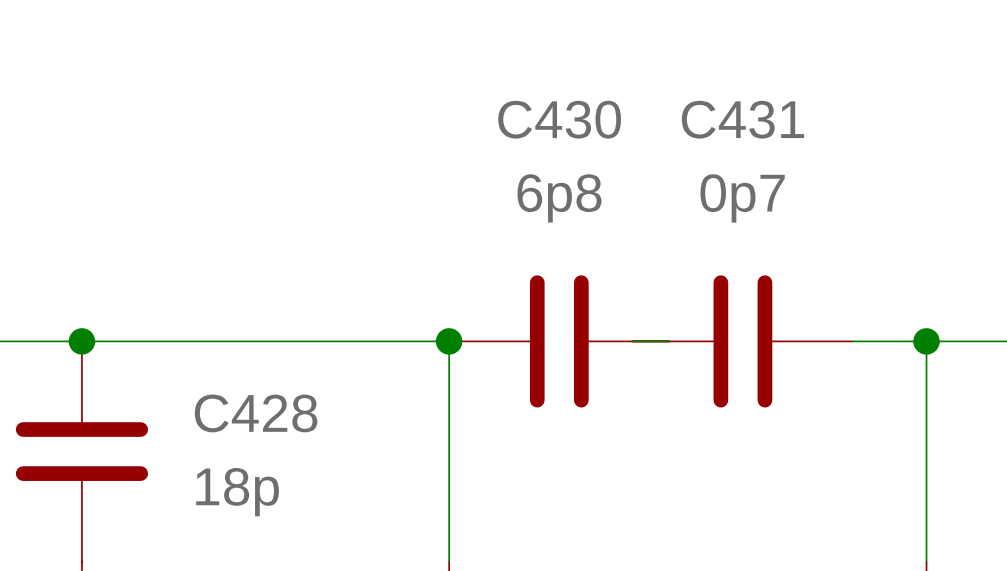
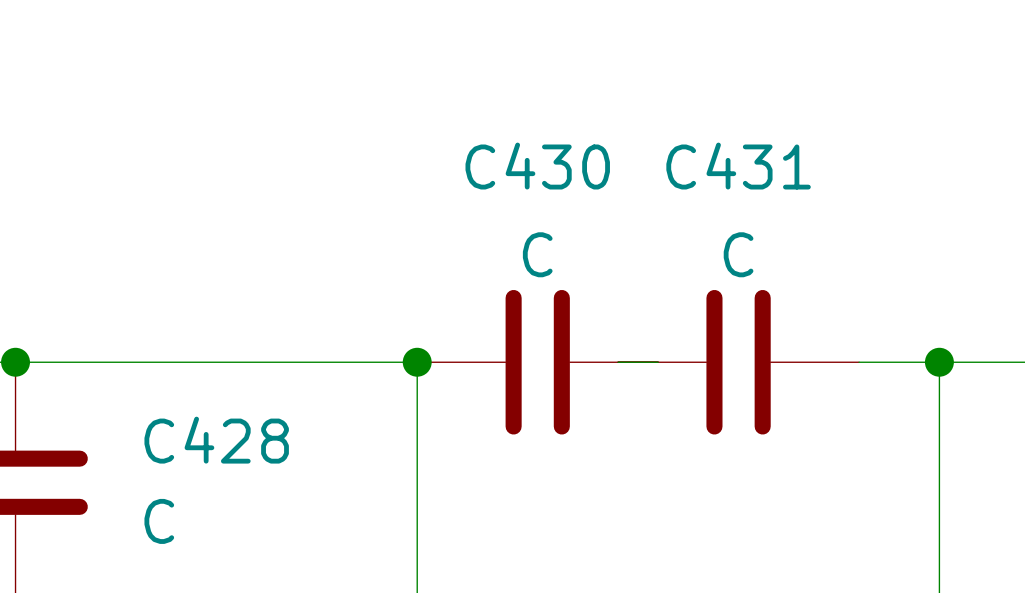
C430 name position: C430 (559, 119) -> C430 (537, 166)
C431 name position: C431 (742, 119) -> C431 (738, 166)
C430 value: 6p8 (559, 198) -> C (537, 254)
C431 value: 0p7 (742, 198) -> C (738, 254)
C428 value: 18p (237, 492) -> C (159, 521)

